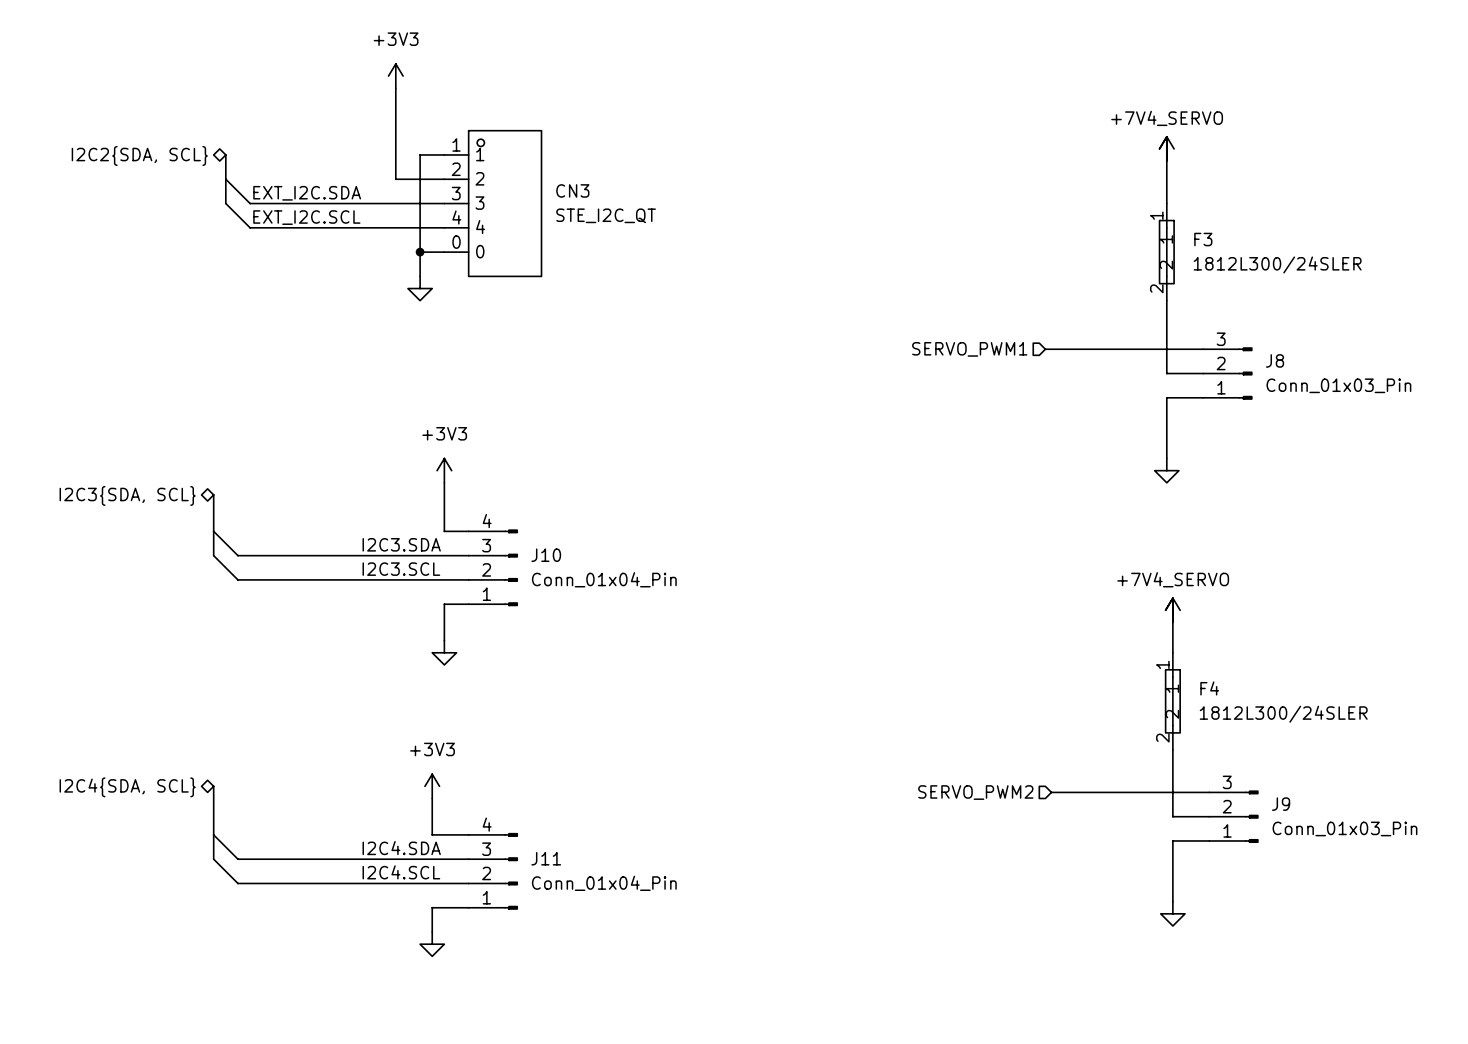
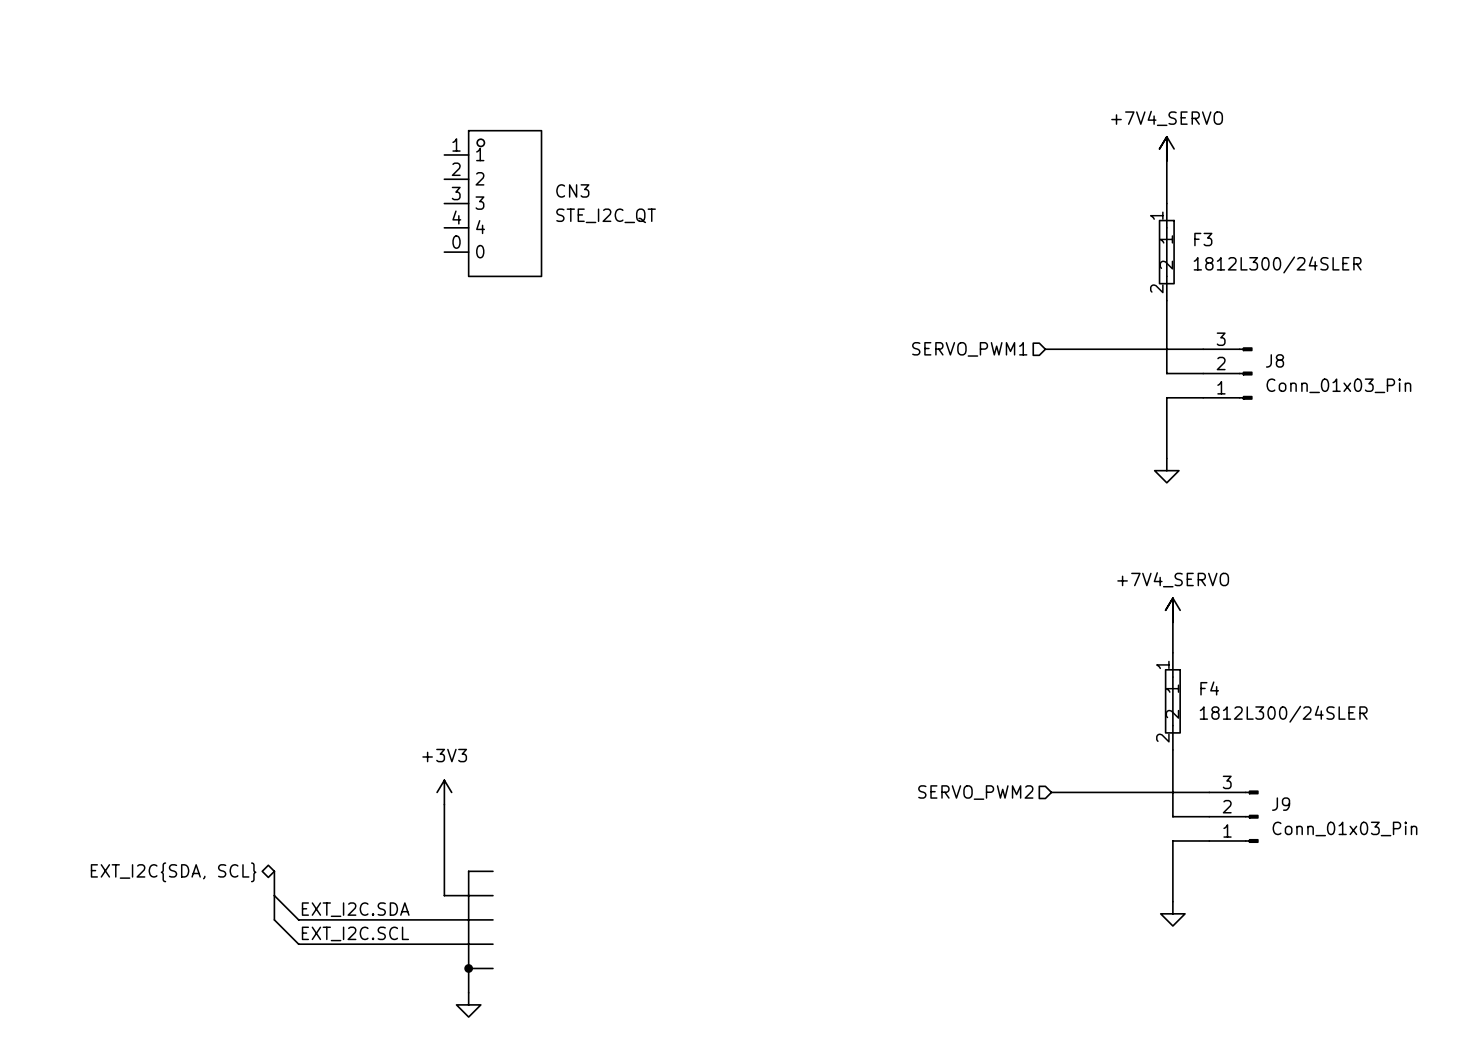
power symbol: +3V3 (395, 76) -> none
wire: (395, 88) (395, 179) (444, 179) -> none
bus: (225, 154) (225, 203) -> none
wire: (444, 154) (420, 154) (420, 276) -> none
hierarchical label: I2C2{SDA, SCL} (139, 155) -> none
wire: (225, 179) (250, 203) (444, 203) -> none
label: EXT_I2C.SDA (307, 193) -> none
wire: (225, 203) (250, 227) (444, 227) -> none
label: EXT_I2C.SCL (306, 217) -> none
wire: (420, 252) (444, 252) -> none
junction: (420, 252) -> none
power symbol: (420, 288) -> none
power symbol: +3V3 (444, 470) -> none
wire: (444, 482) (444, 531) (468, 531) -> none
bus: (213, 494) (213, 555) -> none
hierarchical label: I2C3{SDA, SCL} (127, 495) -> none
wire: (213, 531) (237, 555) (468, 555) -> none
label: I2C3.SDA (401, 544) -> none
wire: (213, 555) (237, 579) (468, 579) -> none
J10: Conn_01x04_Pin (493, 567) -> none
label: I2C3.SCL (401, 569) -> none
wire: (468, 604) (444, 604) (444, 640) -> none
power symbol: (444, 652) -> none
bus: (213, 786) (213, 859) -> none
power symbol position: +3V3 (432, 786) -> +3V3 (444, 792)
hierarchical label: I2C4{SDA, SCL} (127, 787) -> none
wire: (432, 798) (432, 834) (468, 834) -> none
wire: none -> (444, 804) (444, 895) (492, 895)
wire: (213, 834) (237, 859) (468, 859) -> none
label: I2C4.SDA (401, 848) -> none
wire: (213, 859) (237, 883) (468, 883) -> none
bus: none -> (274, 871) (274, 919)
wire: none -> (492, 871) (468, 871) (468, 992)
J11: Conn_01x04_Pin (493, 871) -> none
hierarchical label: none -> EXT_I2C{SDA, SCL} (173, 872)
label: I2C4.SCL (401, 872) -> none
wire: none -> (274, 895) (298, 919) (492, 919)
wire: (468, 907) (432, 907) (432, 932) -> none
label: none -> EXT_I2C.SDA (355, 909)
wire: none -> (274, 919) (298, 944) (492, 944)
label: none -> EXT_I2C.SCL (355, 933)
power symbol position: (432, 944) -> (468, 1004)
wire: none -> (468, 968) (492, 968)
junction: none -> (468, 968)

